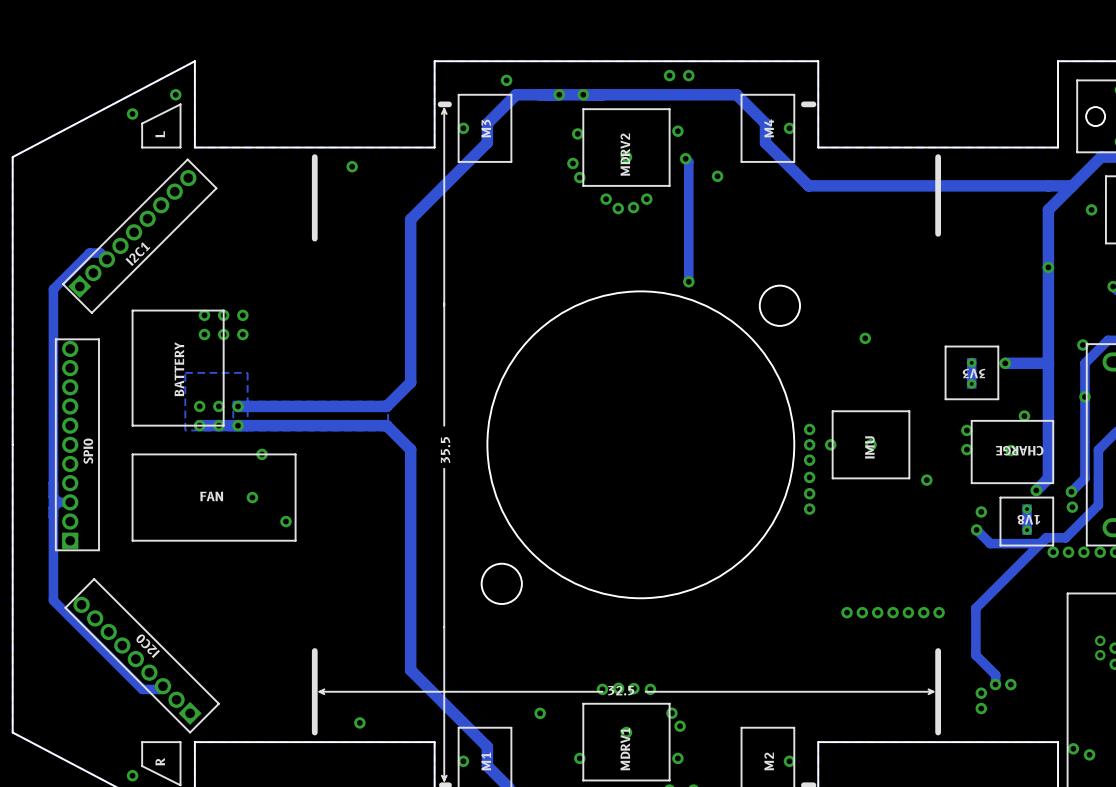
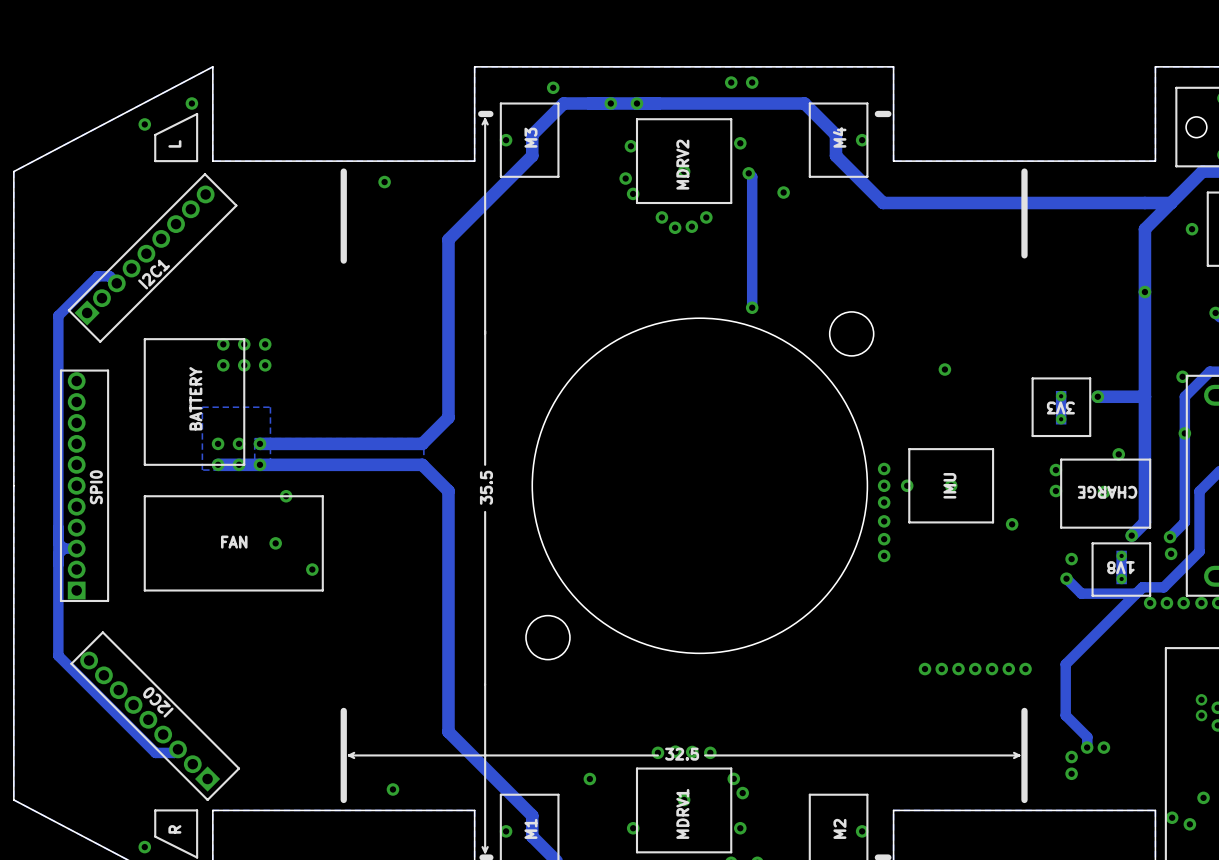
via: none -> (1203, 797)

